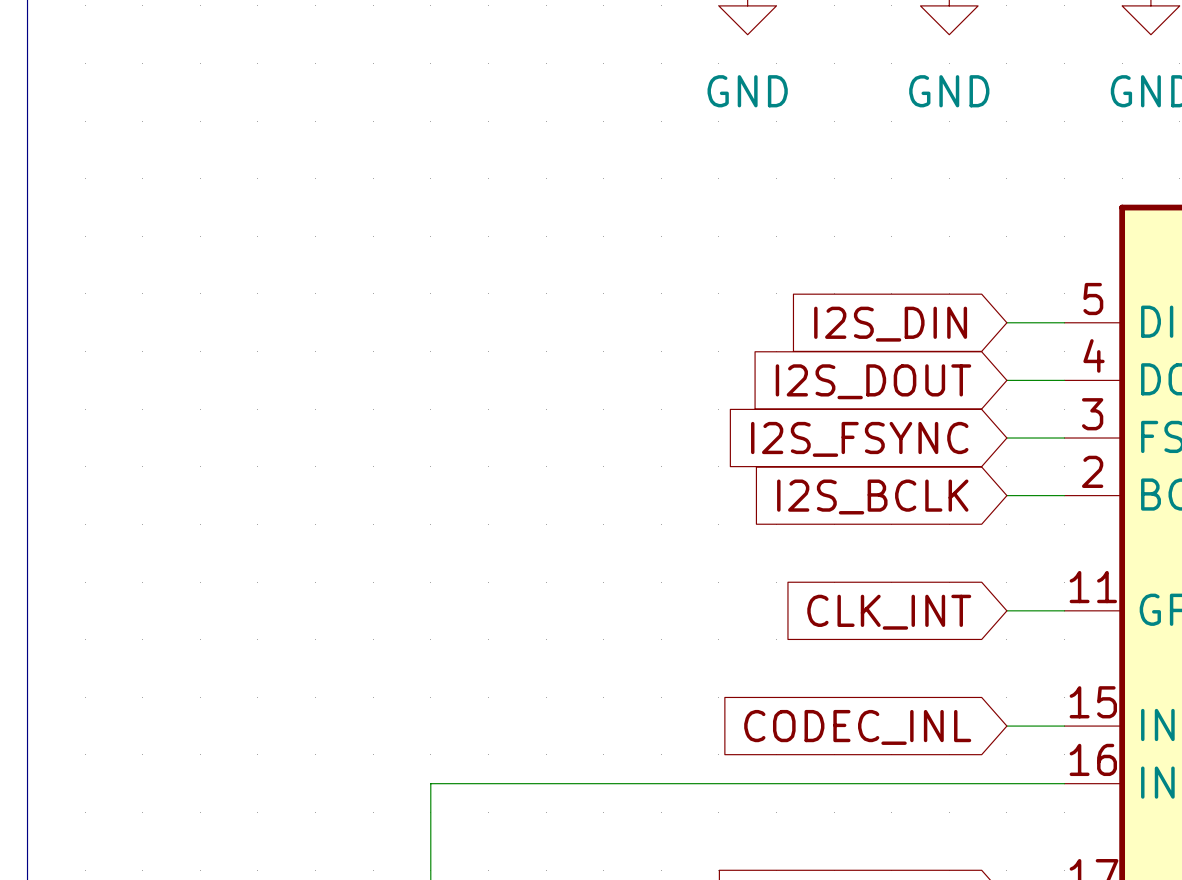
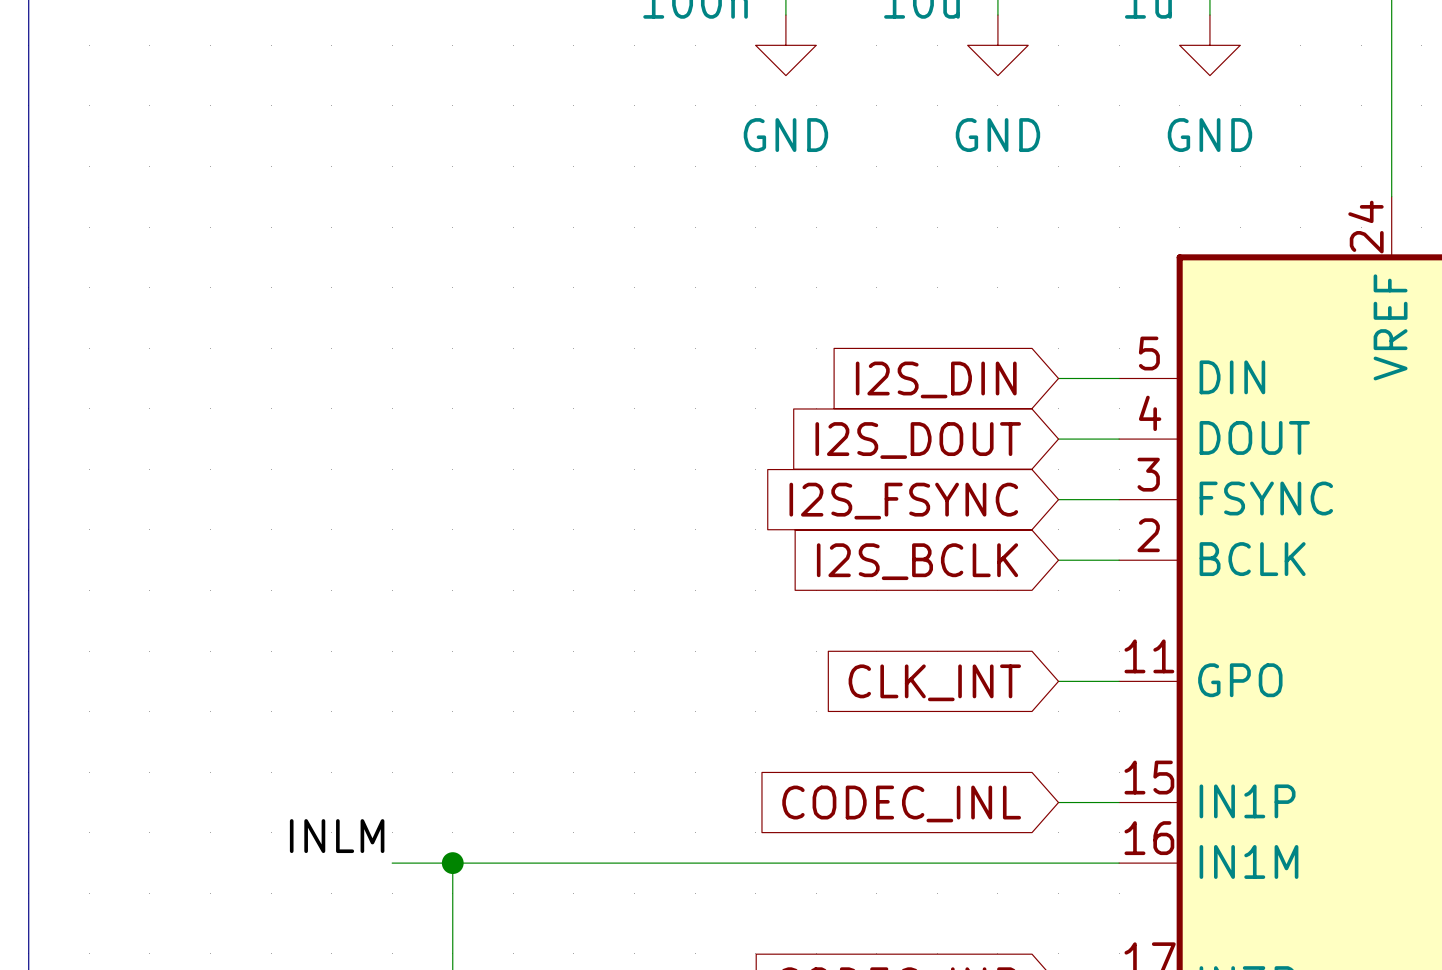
label: none -> INLM (337, 836)
wire: none -> (392, 863) (452, 863)
junction: none -> (452, 863)

